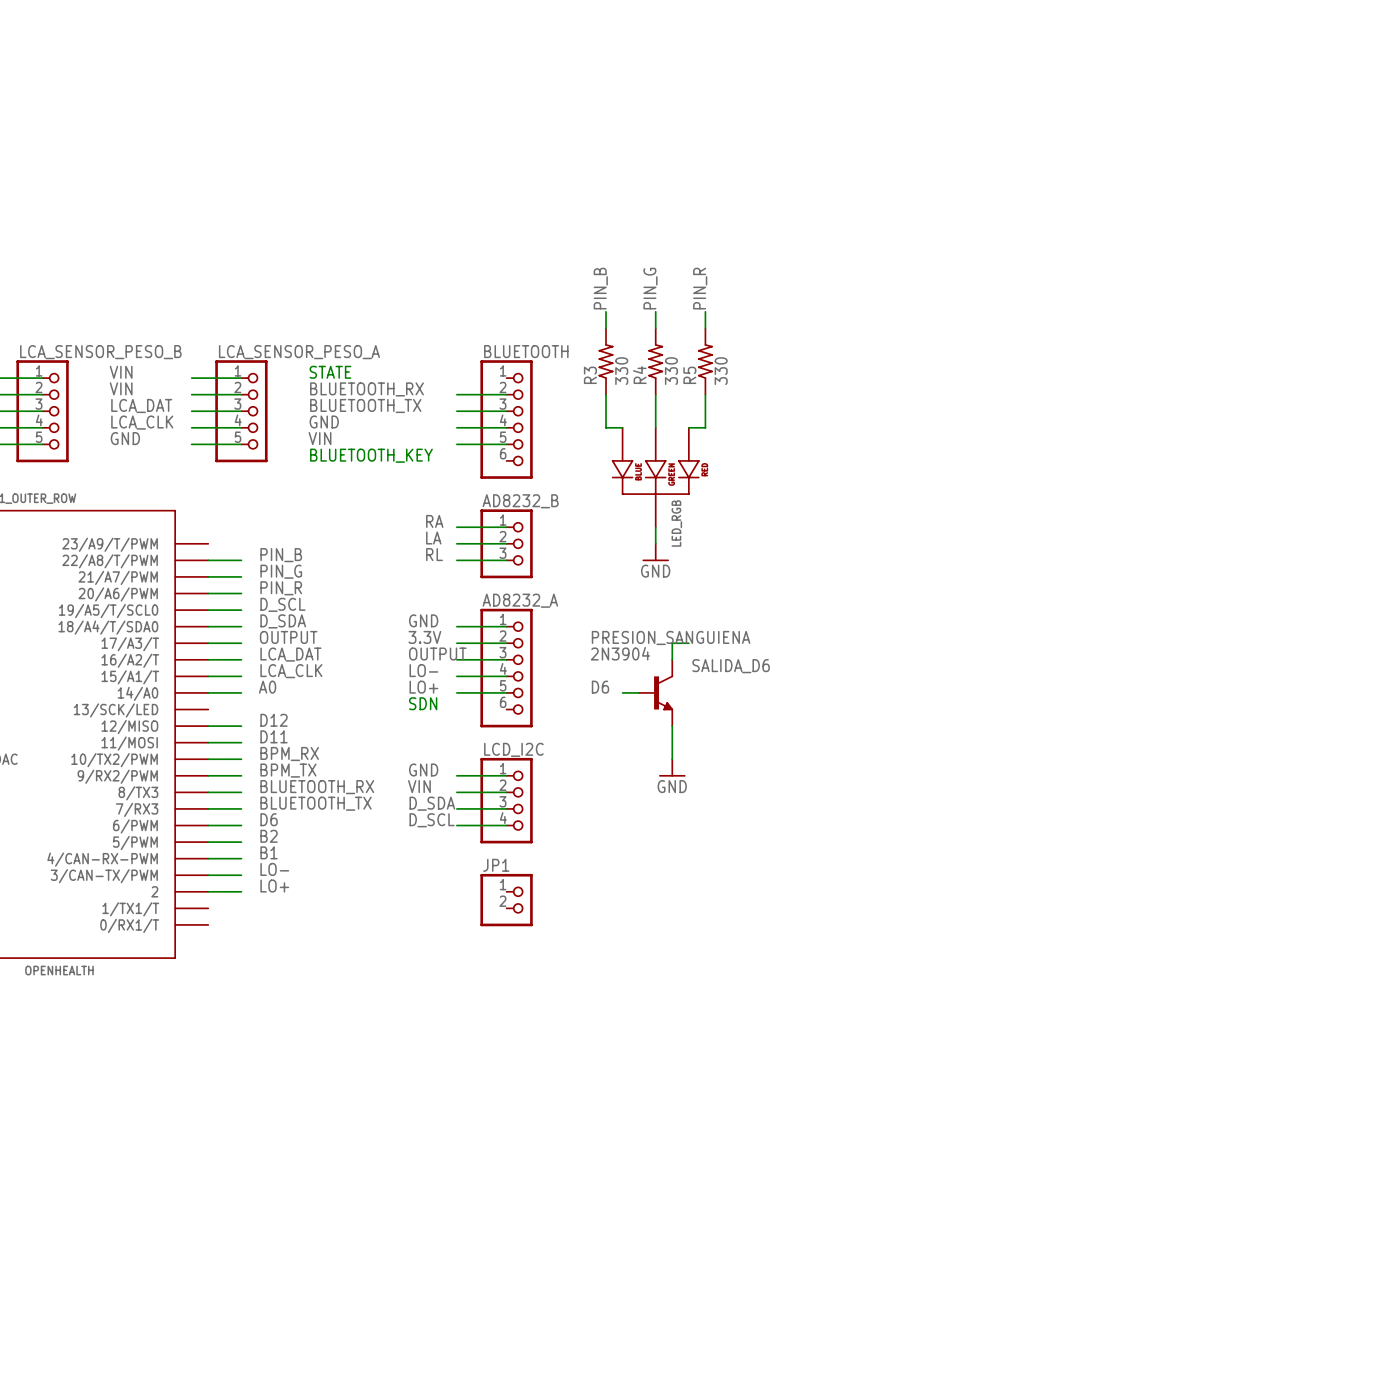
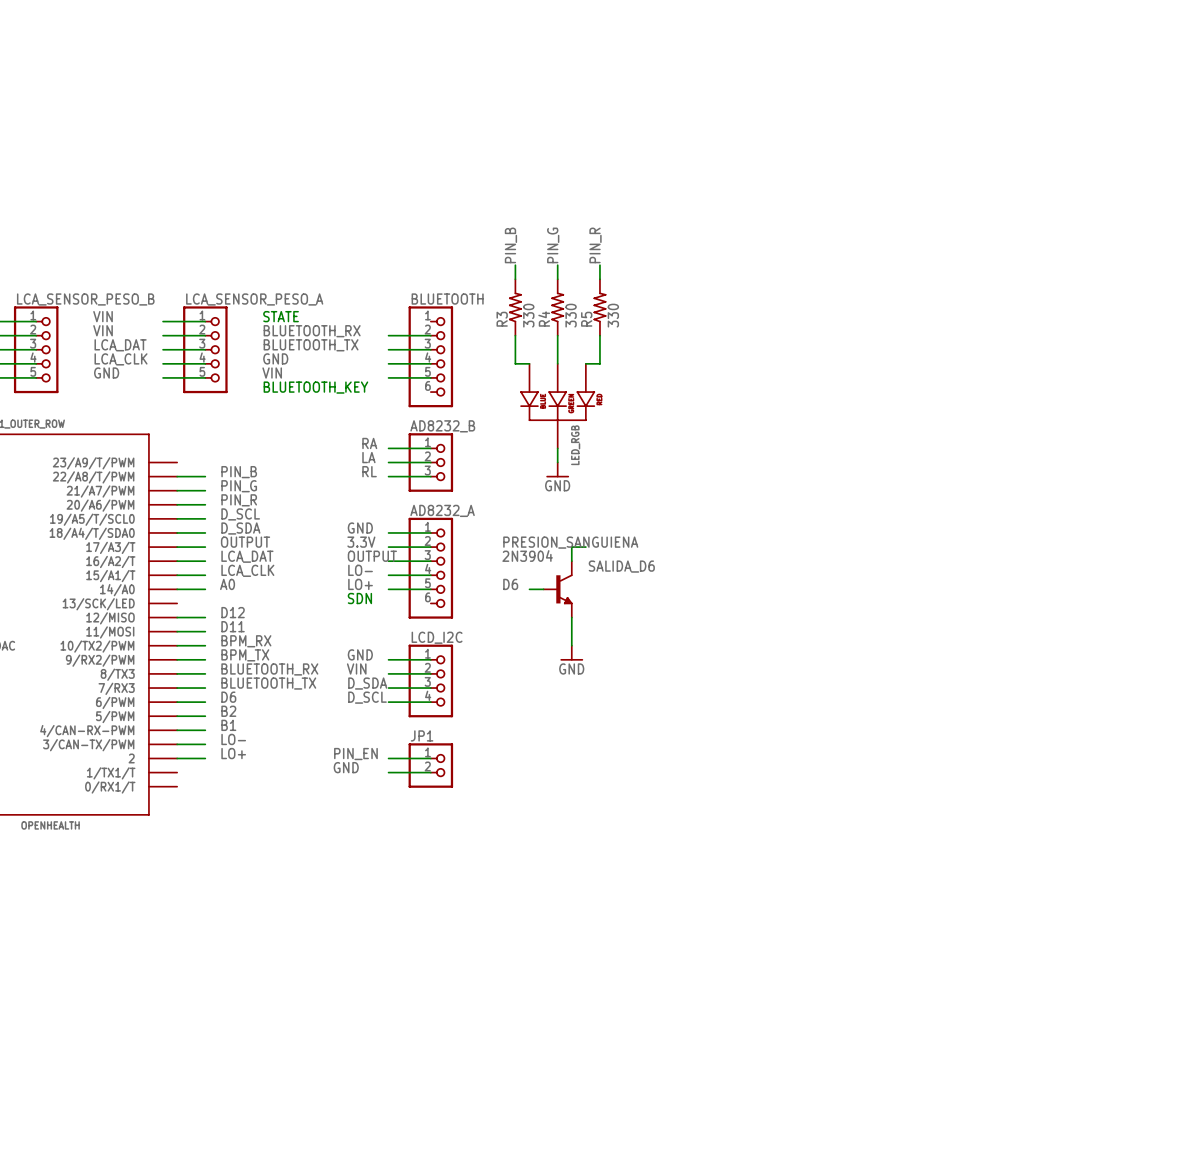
label: none -> PIN_EN (355, 754)
wire: none -> (388, 758) (430, 758)
label: none -> GND (346, 767)
wire: none -> (388, 772) (430, 772)

